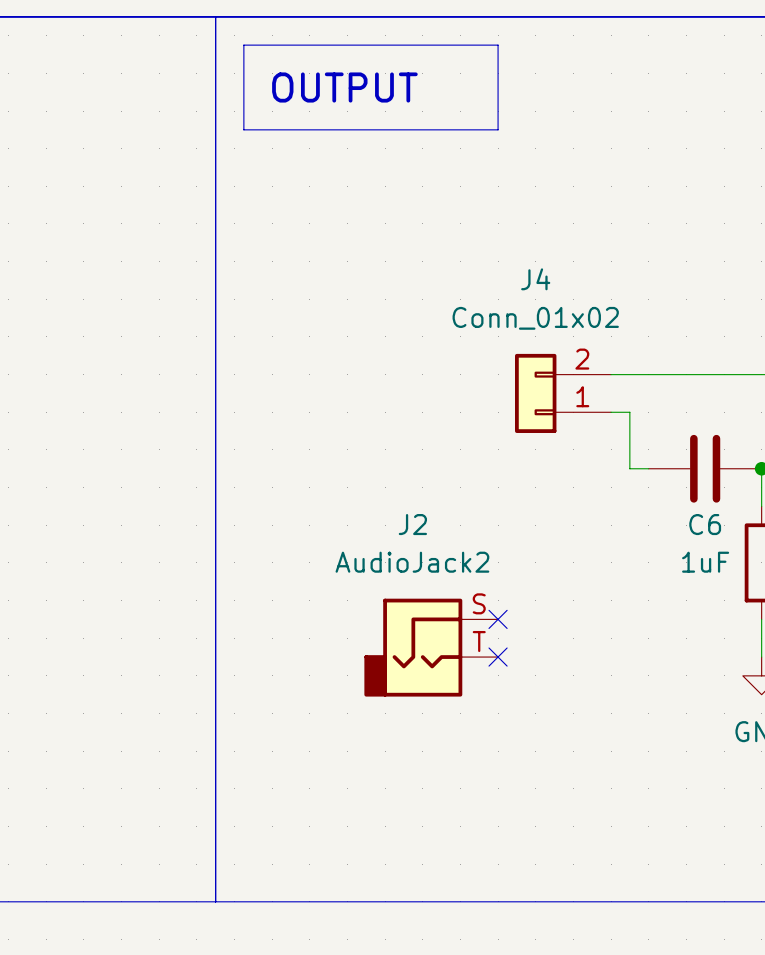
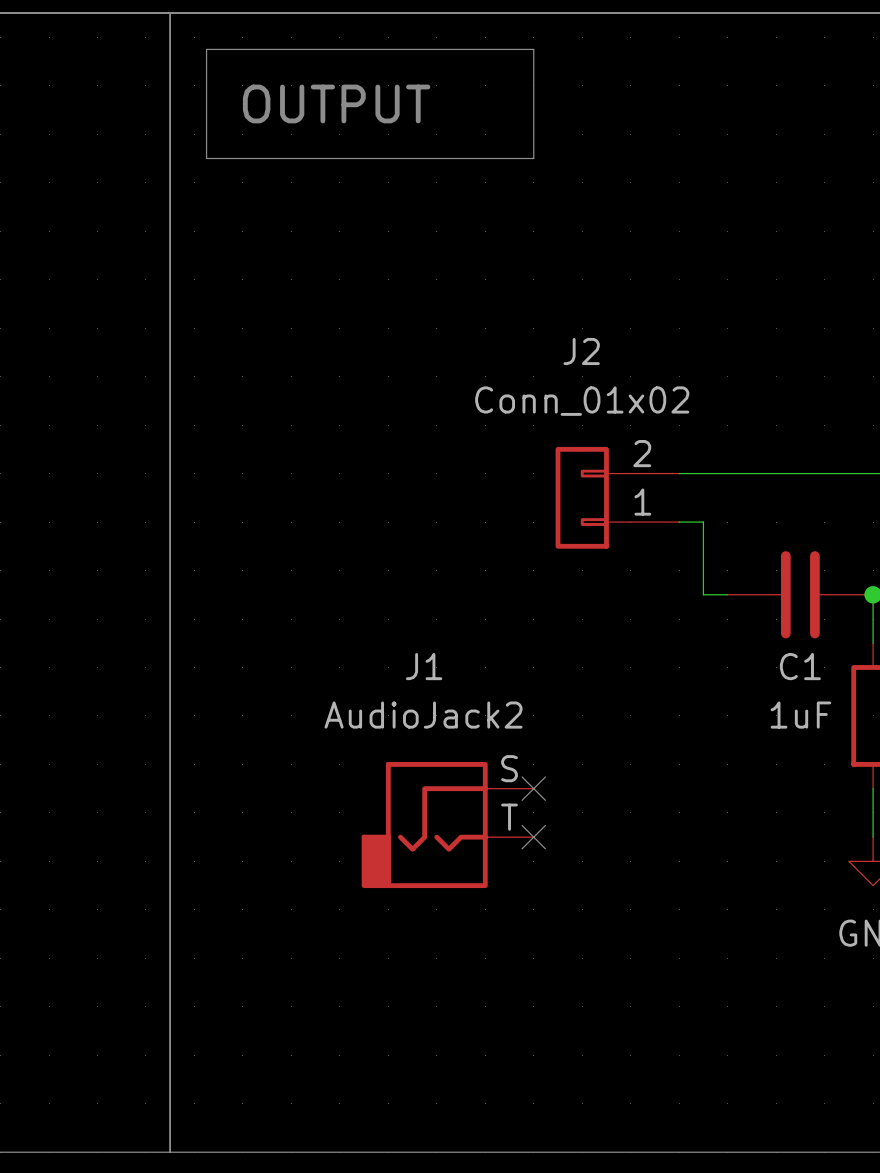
J4 name: J4 (535, 279) -> J2 (581, 351)
J2 name: J2 (412, 524) -> J1 (424, 666)
C6 name: C6 (705, 524) -> C1 (800, 666)

